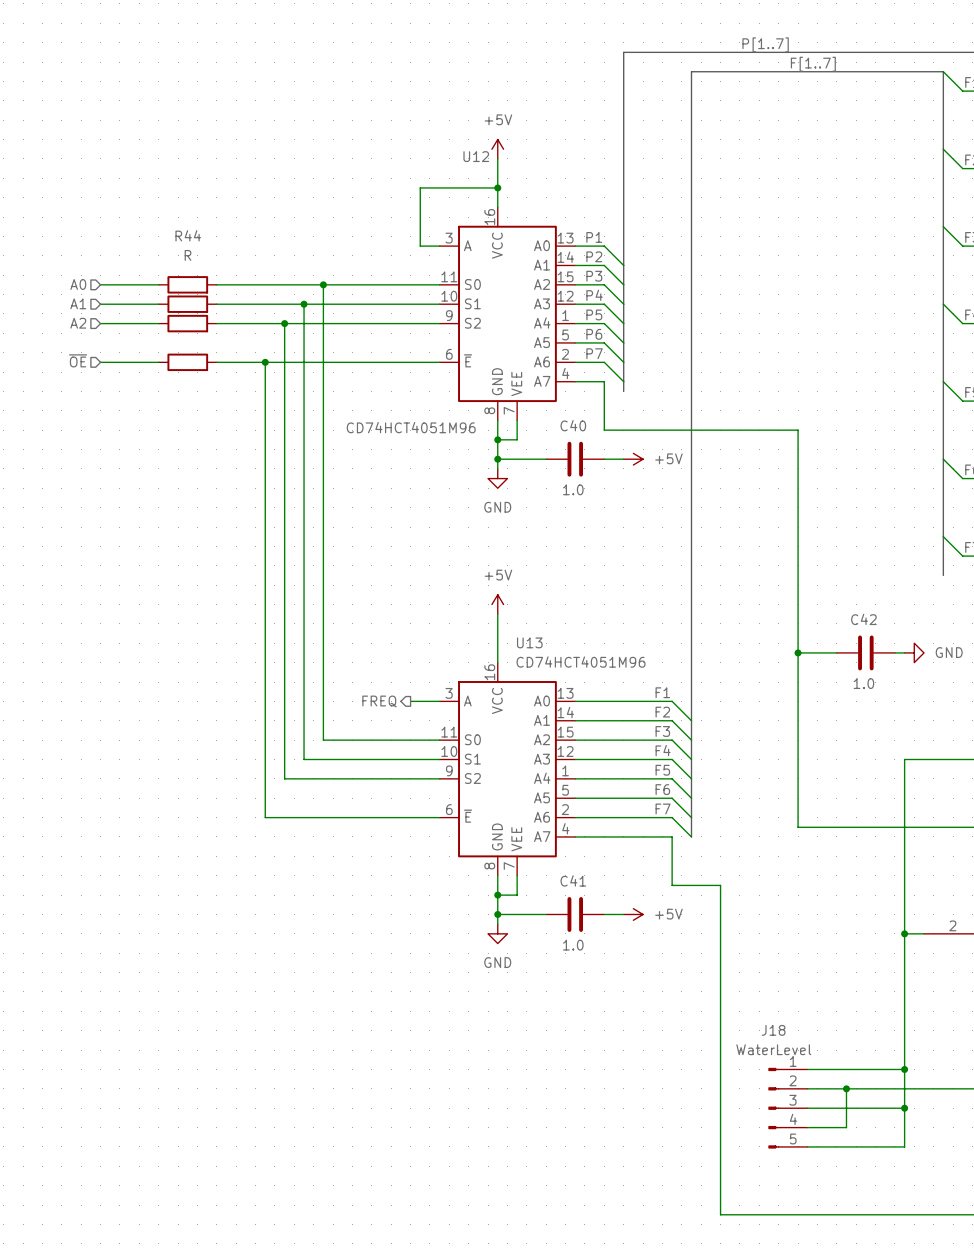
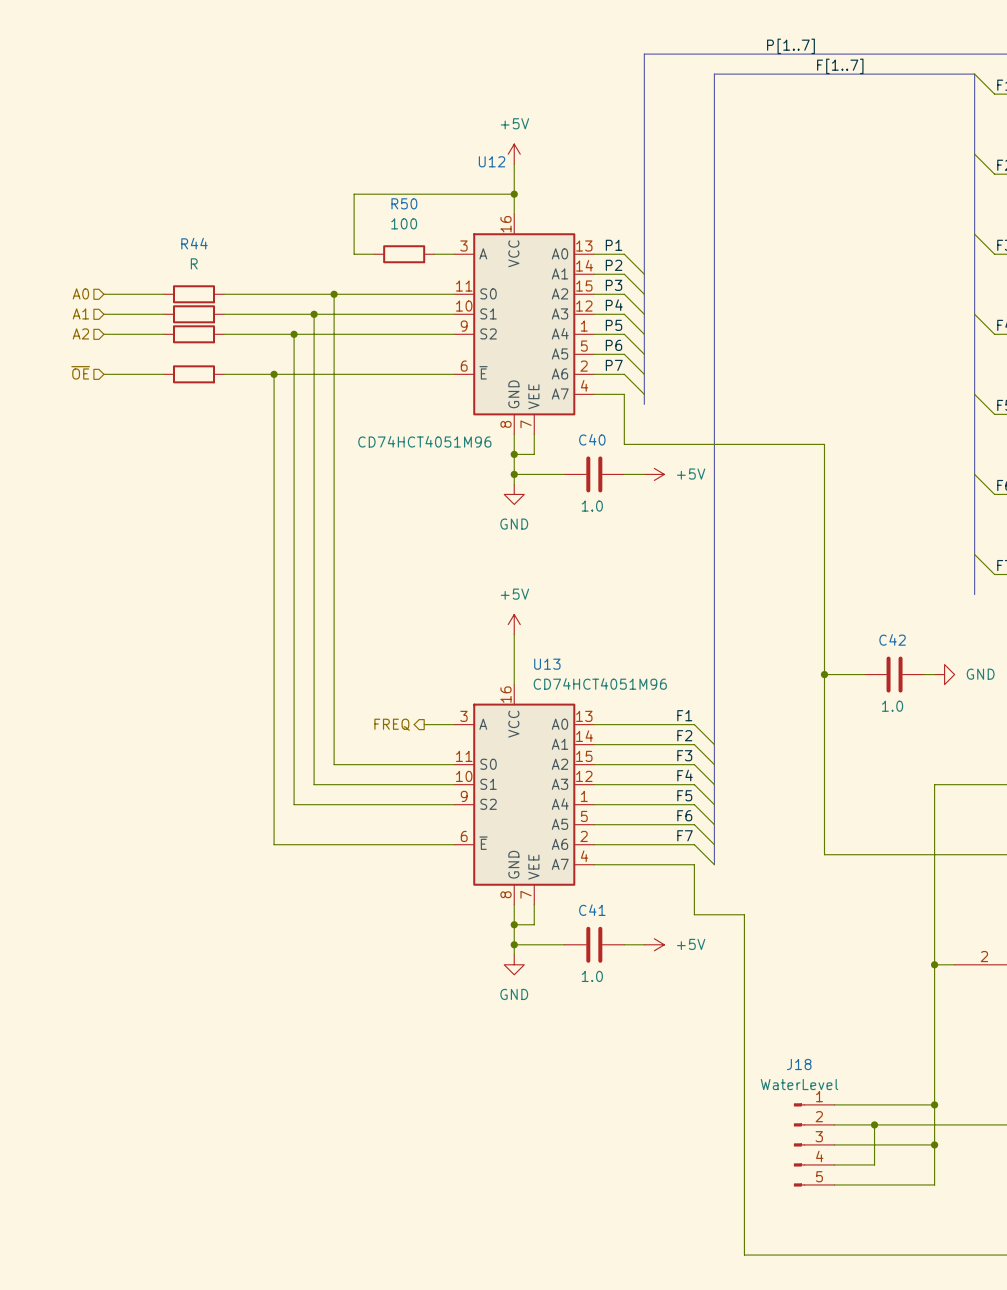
wire: (420, 187) (420, 246) -> (434, 194) (354, 194) (354, 254) (374, 254)
R50: none -> 100 (404, 254)

